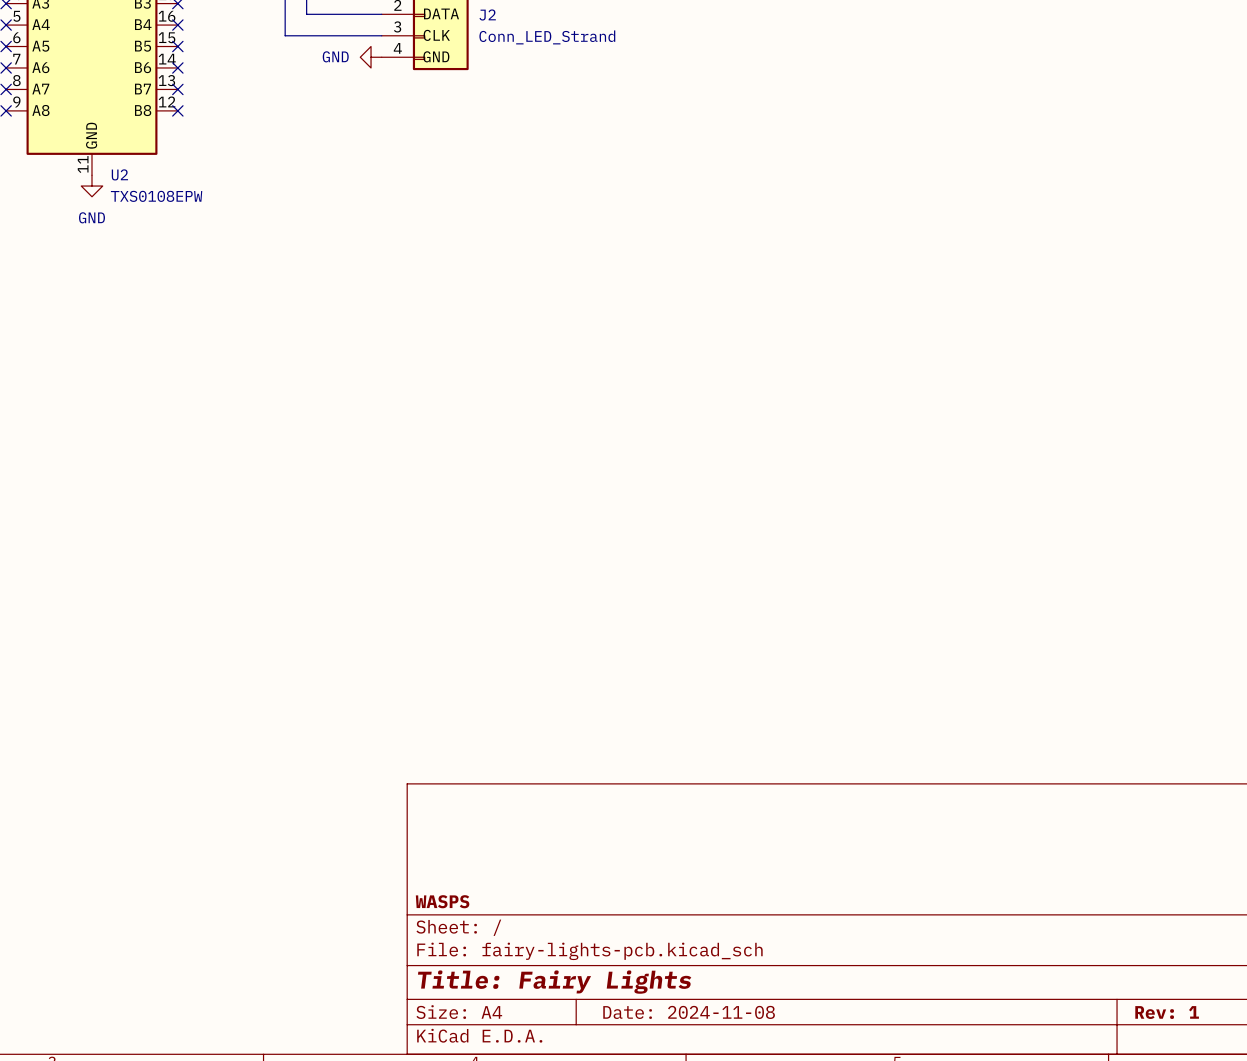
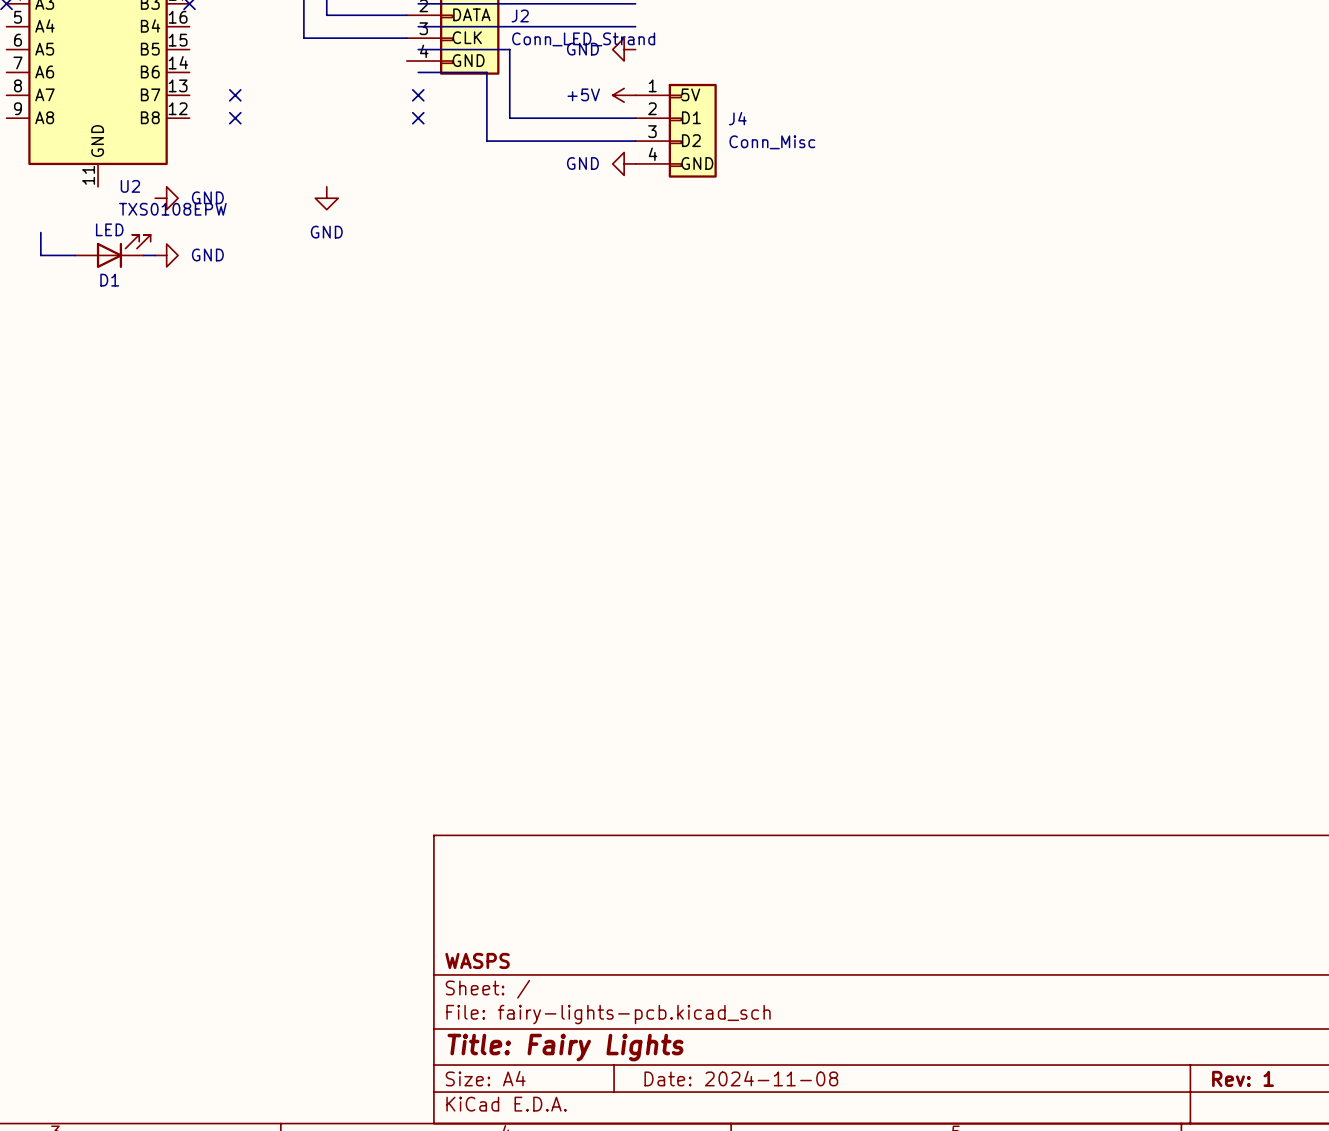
wire: none -> (418, 3) (635, 3)
no-connect mark: (6, 25) -> none
no-connect mark: (177, 25) -> none
wire: none -> (418, 26) (635, 26)
no-connect mark: (6, 46) -> none
no-connect mark: (177, 46) -> none
wire: none -> (418, 49) (509, 49) (509, 118) (635, 118)
power symbol: none -> GND (624, 49)
power symbol: GND (371, 57) -> none
no-connect mark: (6, 67) -> none
no-connect mark: (177, 67) -> none
wire: none -> (418, 72) (486, 72) (486, 141) (635, 141)
no-connect mark: (6, 89) -> none
no-connect mark: (177, 89) -> none
no-connect mark: none -> (235, 95)
no-connect mark: none -> (418, 95)
power symbol: none -> +5V (624, 95)
no-connect mark: (6, 110) -> none
no-connect mark: (177, 110) -> none
no-connect mark: none -> (235, 118)
no-connect mark: none -> (418, 118)
J4: none -> Conn_Misc (676, 130)
power symbol: none -> GND (624, 163)
power symbol: GND (91, 186) -> none
power symbol: none -> GND (166, 198)
power symbol: none -> GND (326, 198)
wire: none -> (40, 232) (40, 255) (75, 255)
D1: none -> LED (112, 251)
wire: none -> (143, 255) (155, 255)
power symbol: none -> GND (166, 255)

